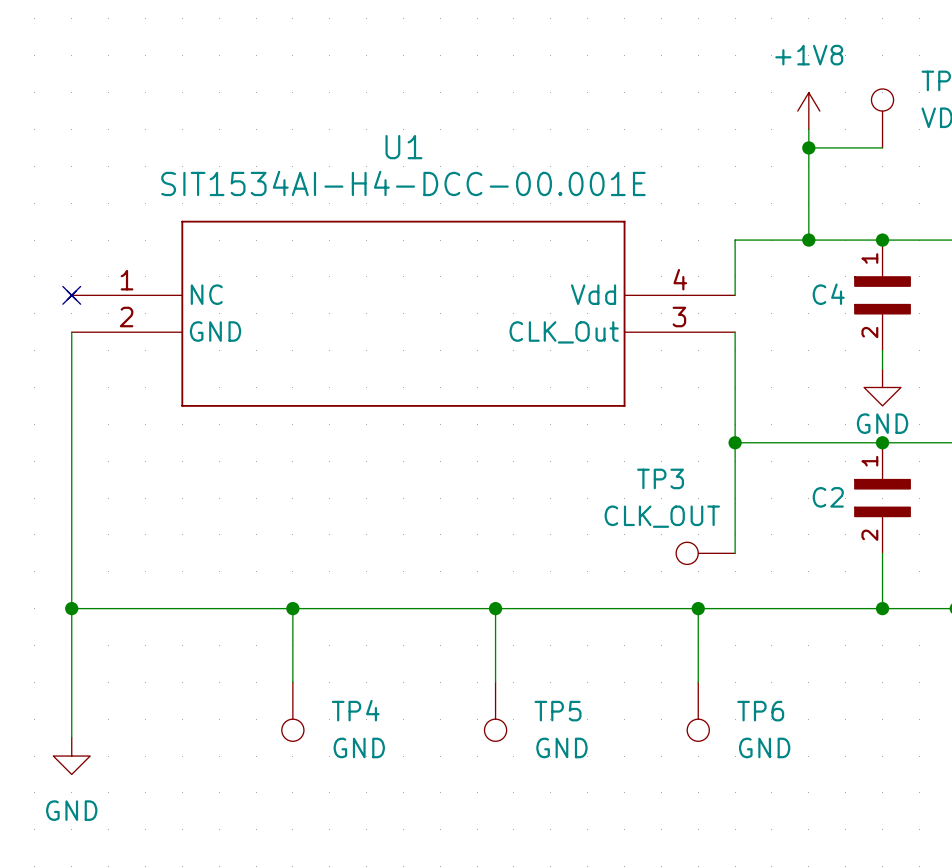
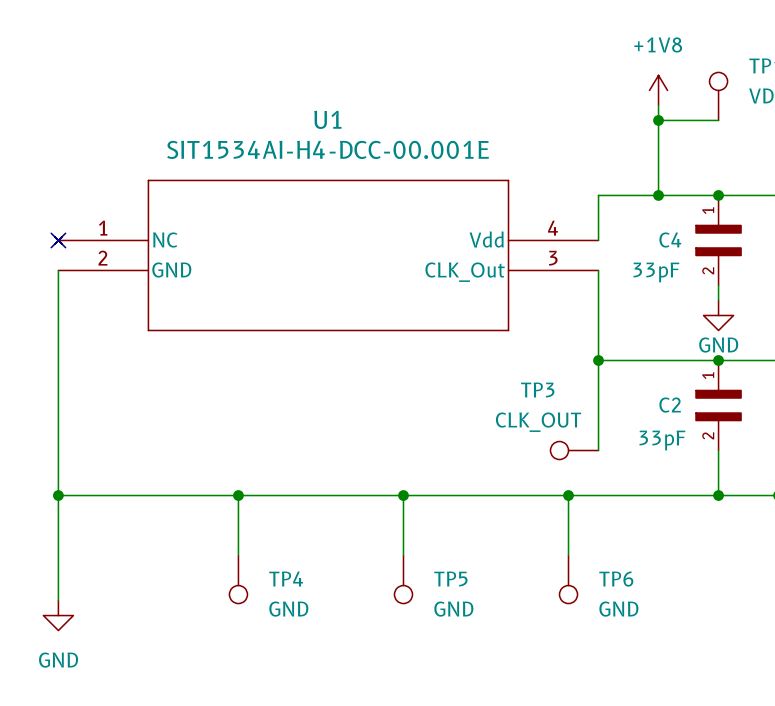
C4 value: none -> 33pF (656, 272)
C2 value: none -> 33pF (662, 440)

